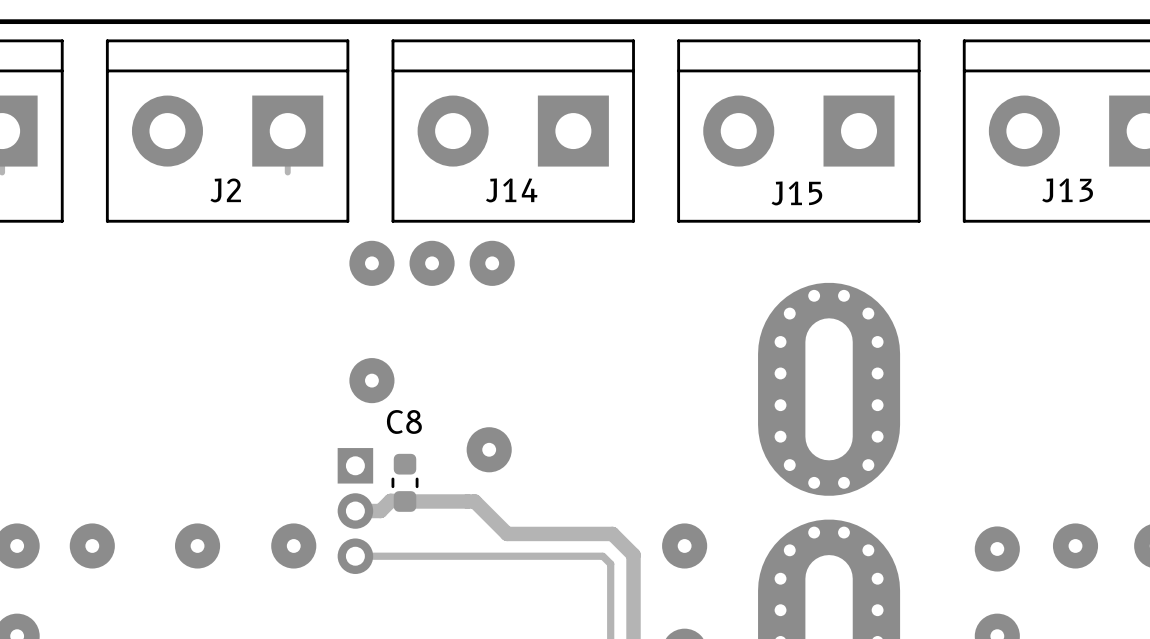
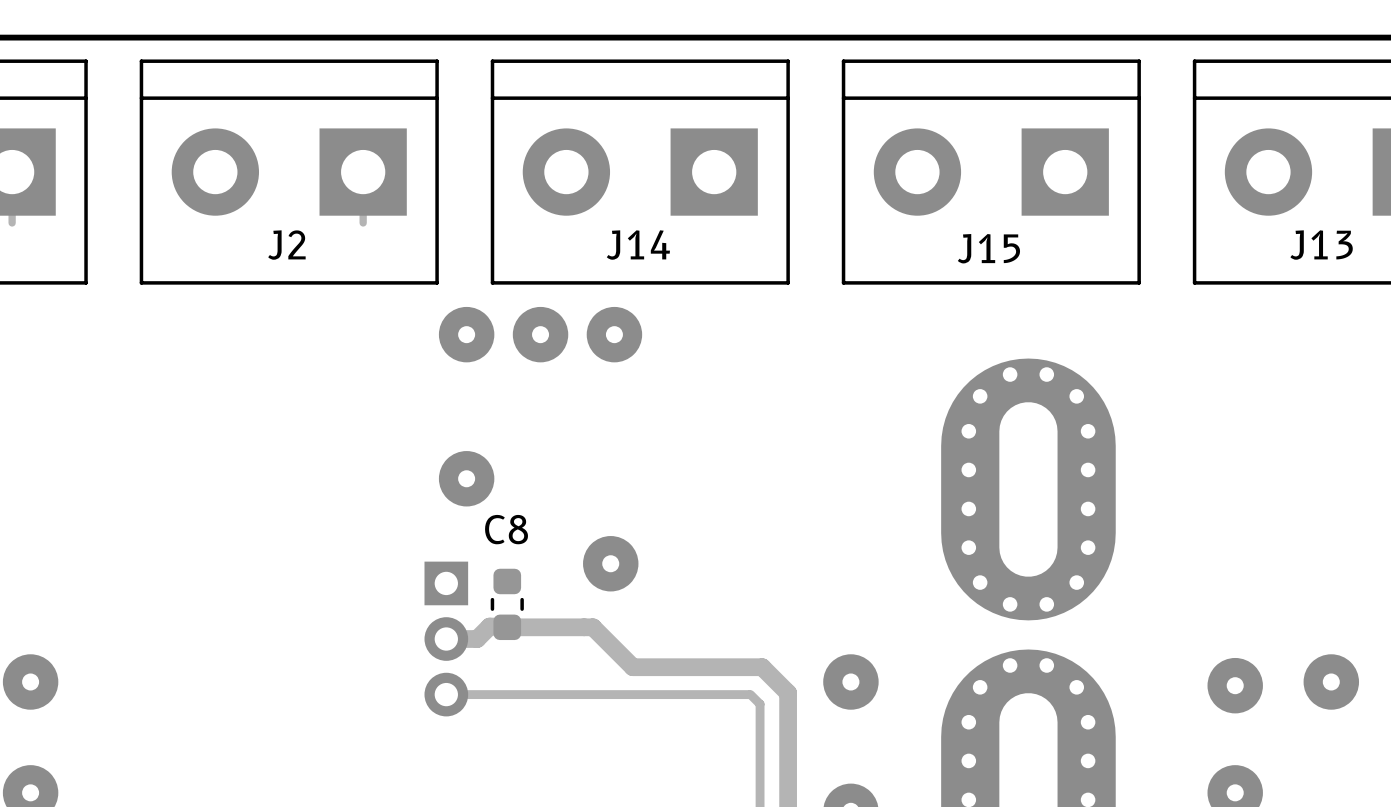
via: (92, 545) -> none
via: (197, 545) -> none
via: (293, 545) -> none

